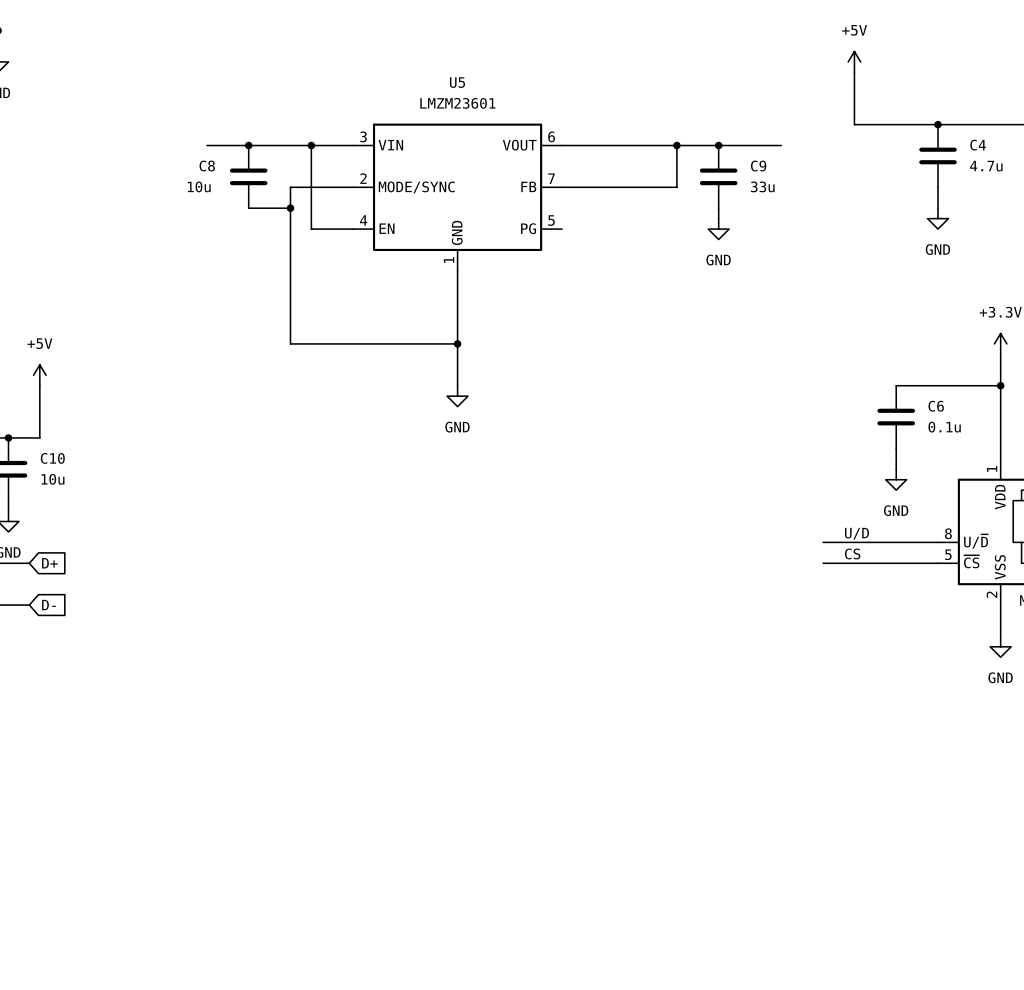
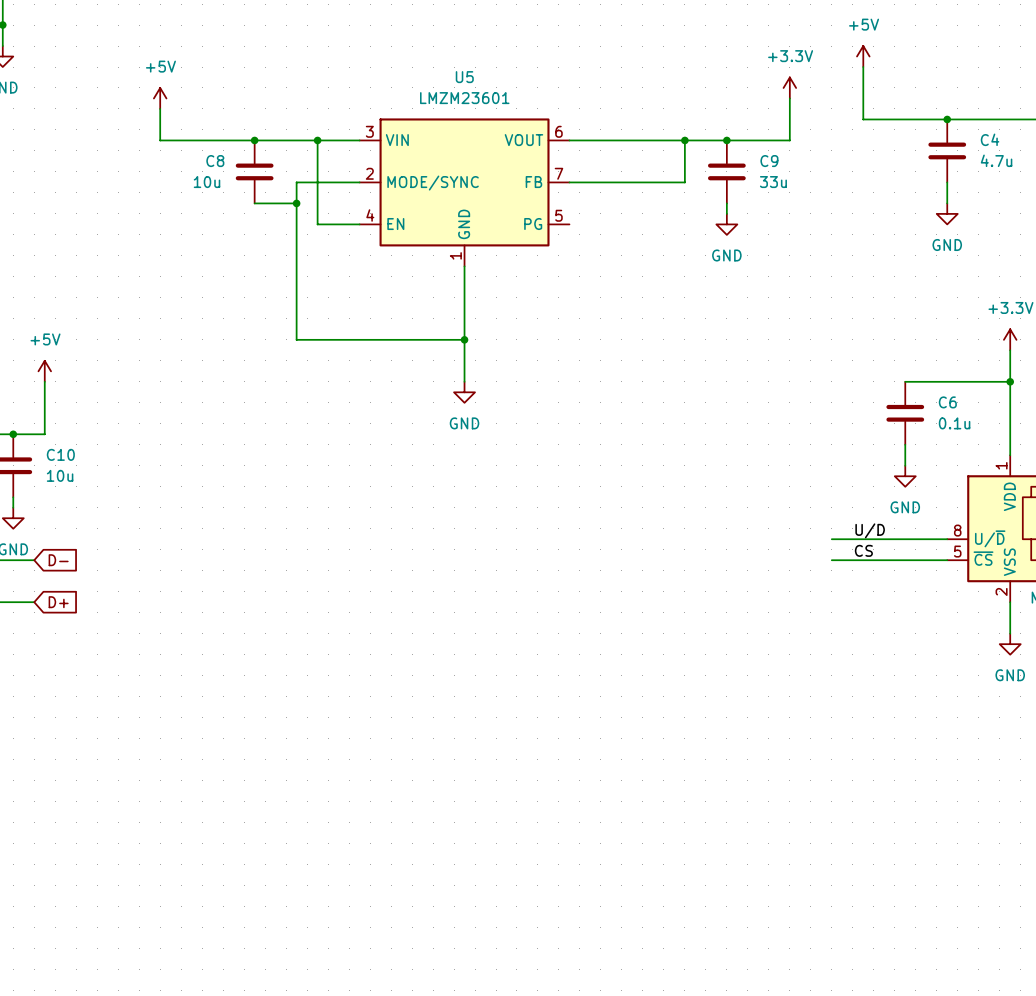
power symbol: none -> +3.3V (789, 87)
power symbol: none -> +5V (160, 98)
wire: none -> (789, 98) (789, 140)
wire: none -> (160, 108) (160, 140) (212, 140)
global label: D+ (49, 563) -> D- (58, 560)
global label: D- (48, 605) -> D+ (58, 602)

